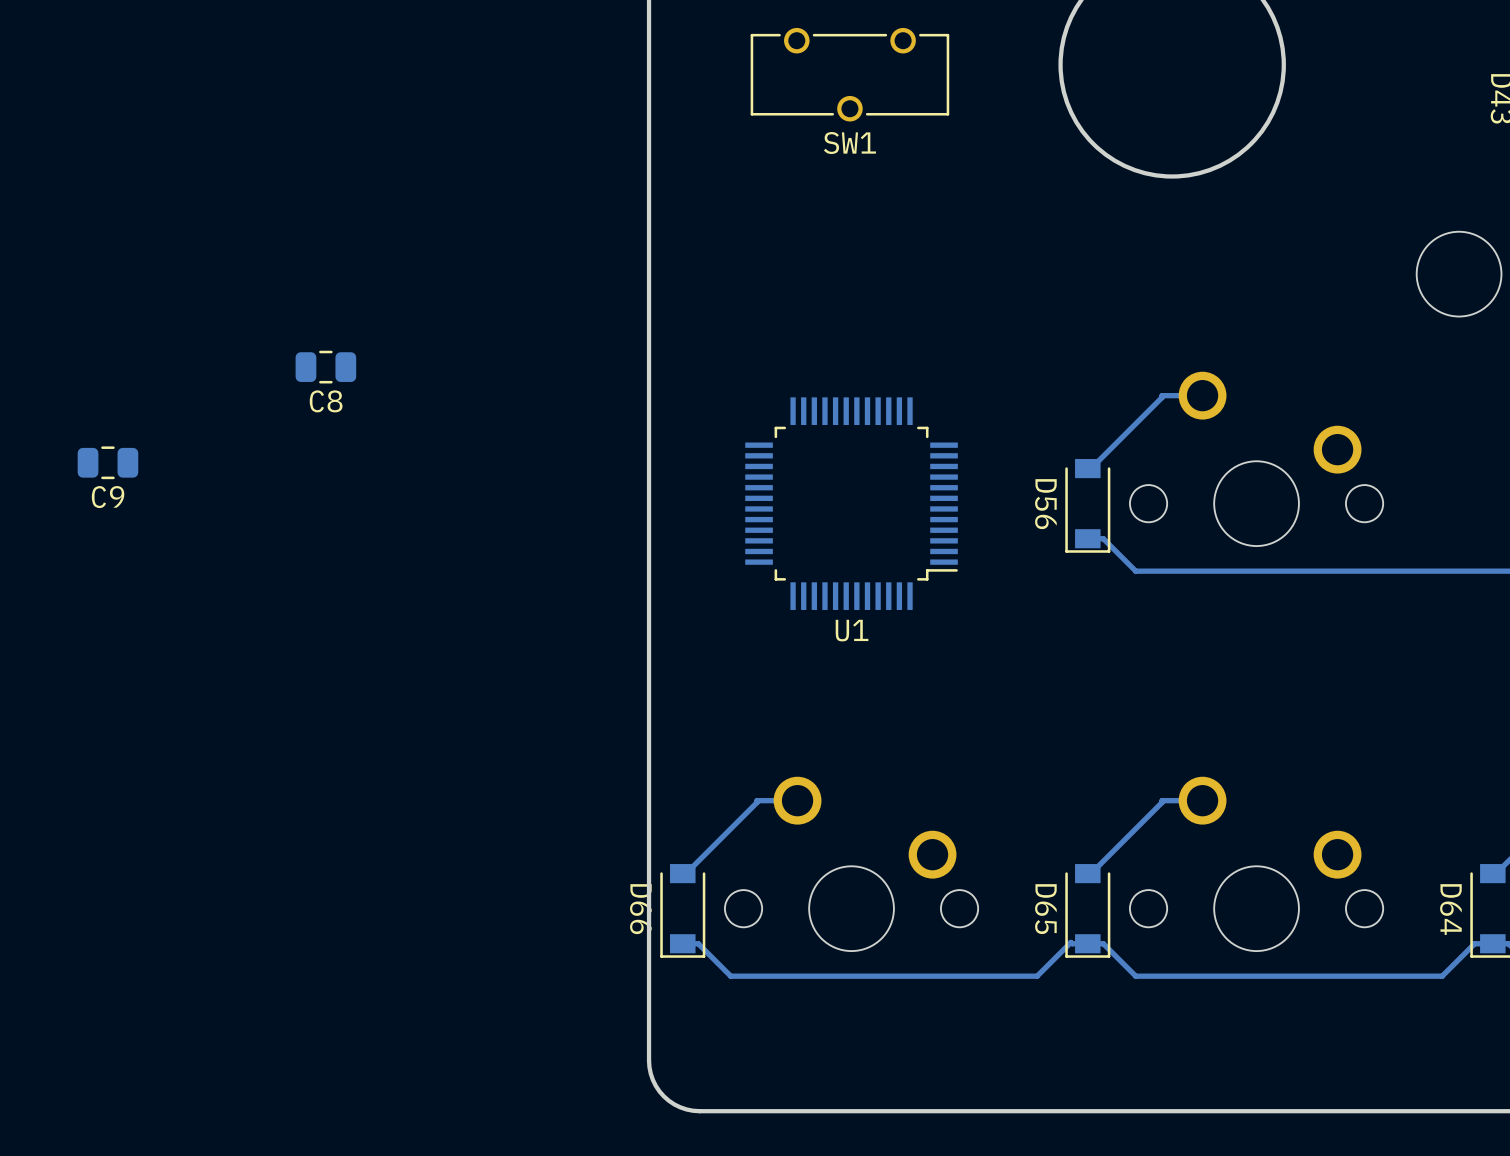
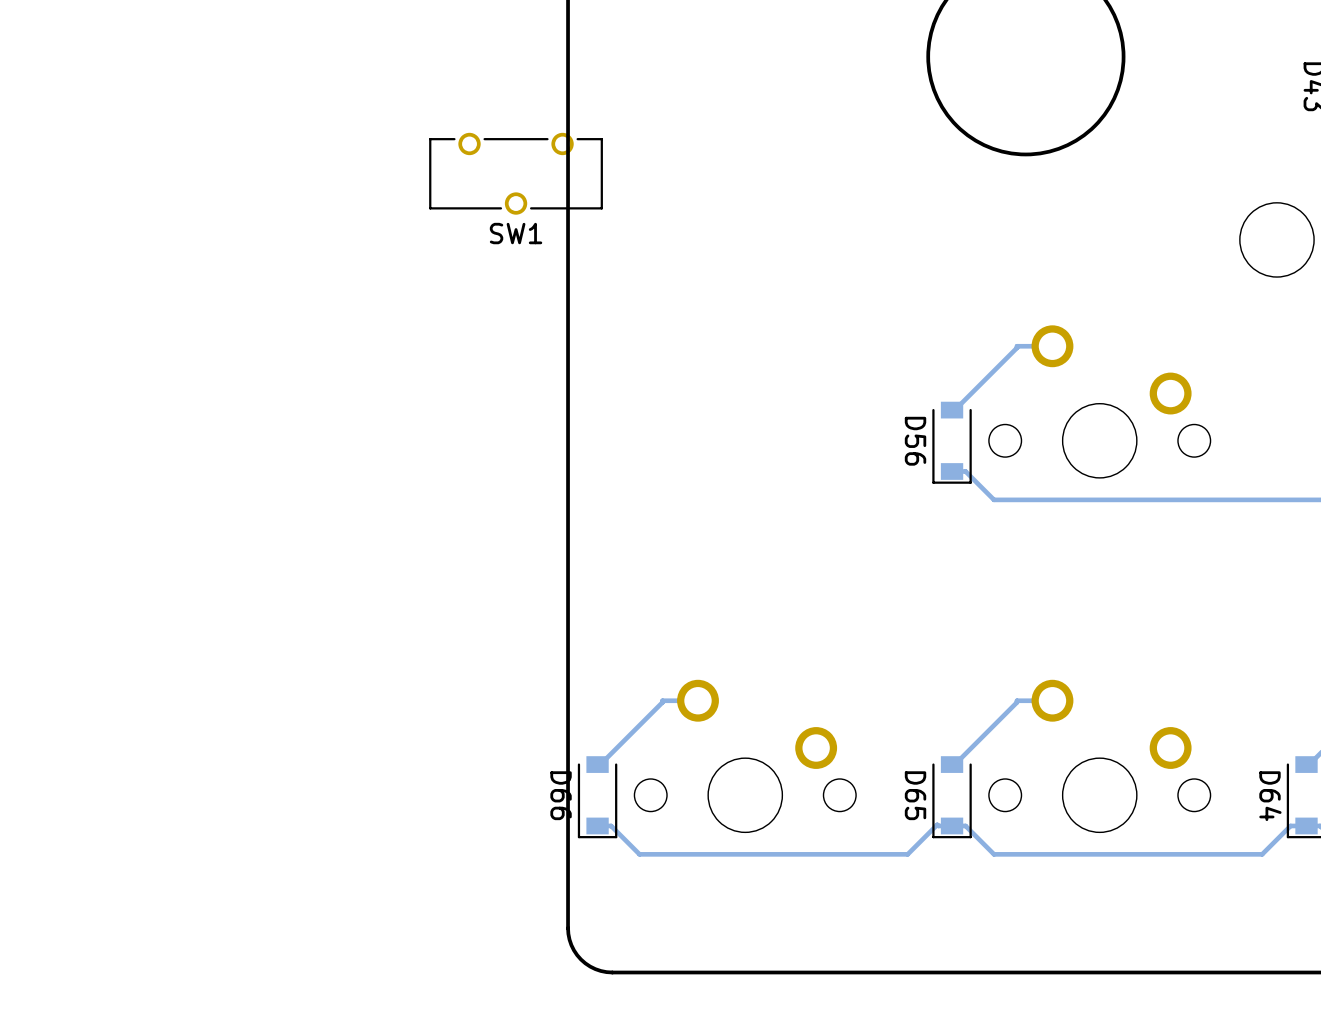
SW1 position: (849, 74) -> (516, 173)
C8: (325, 367) -> none
C9: (107, 462) -> none
U1: (851, 503) -> none

